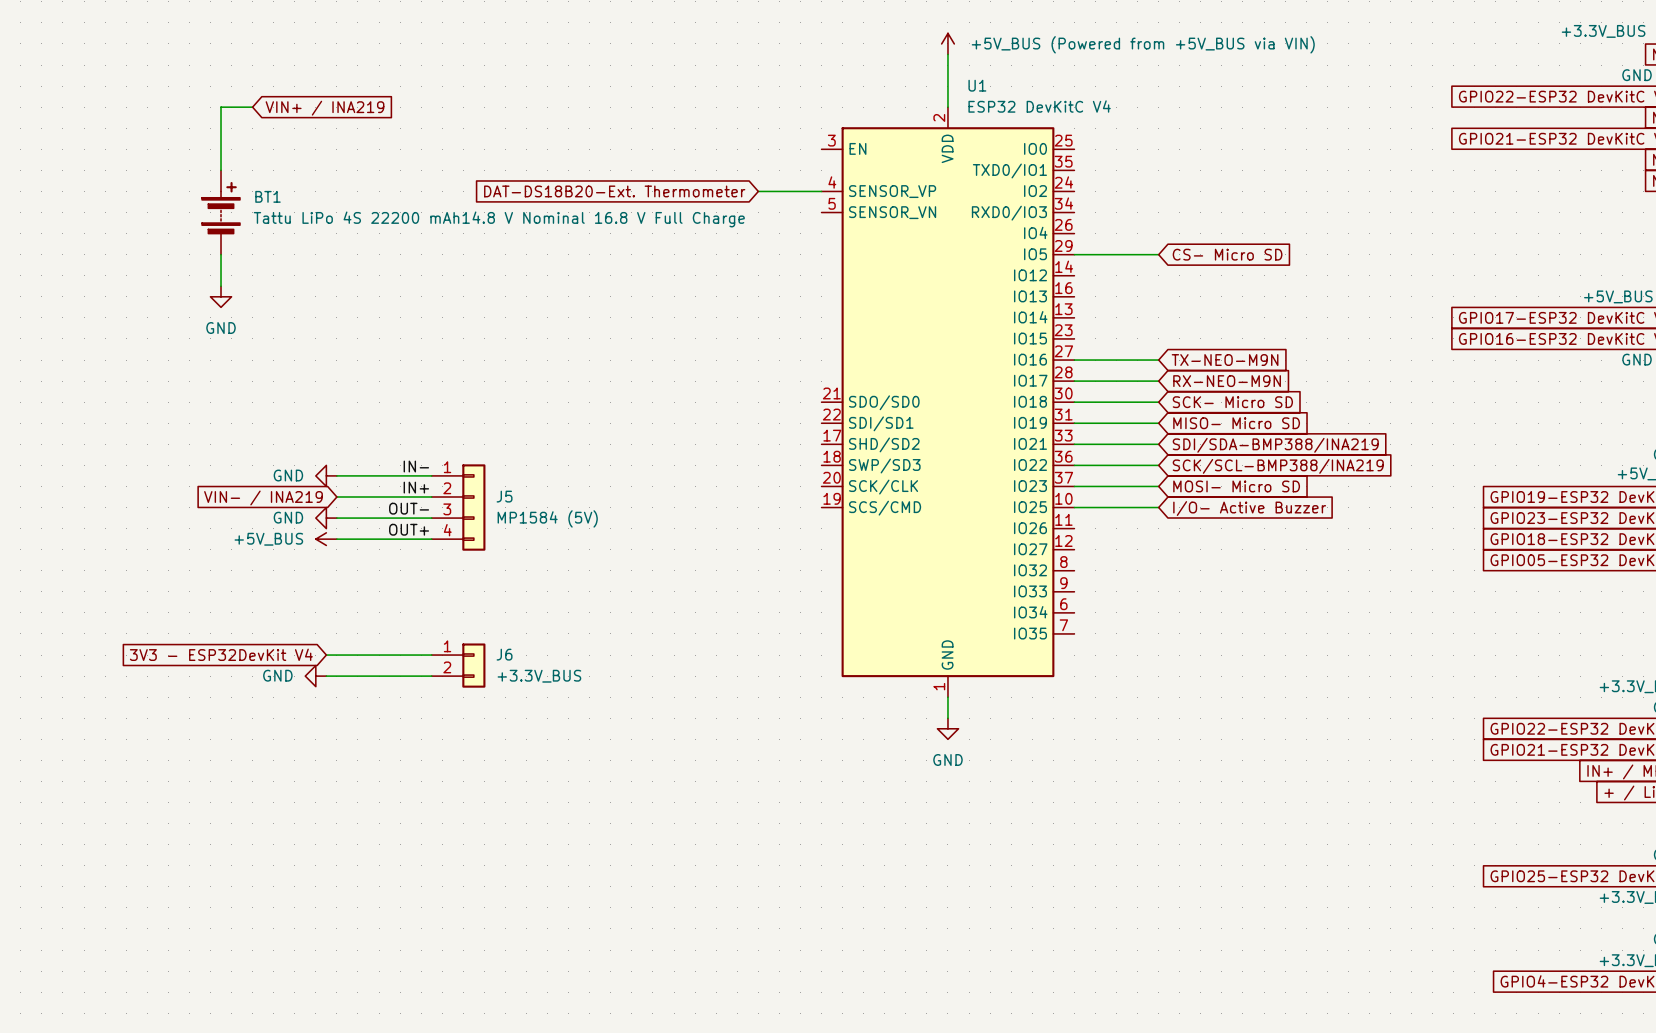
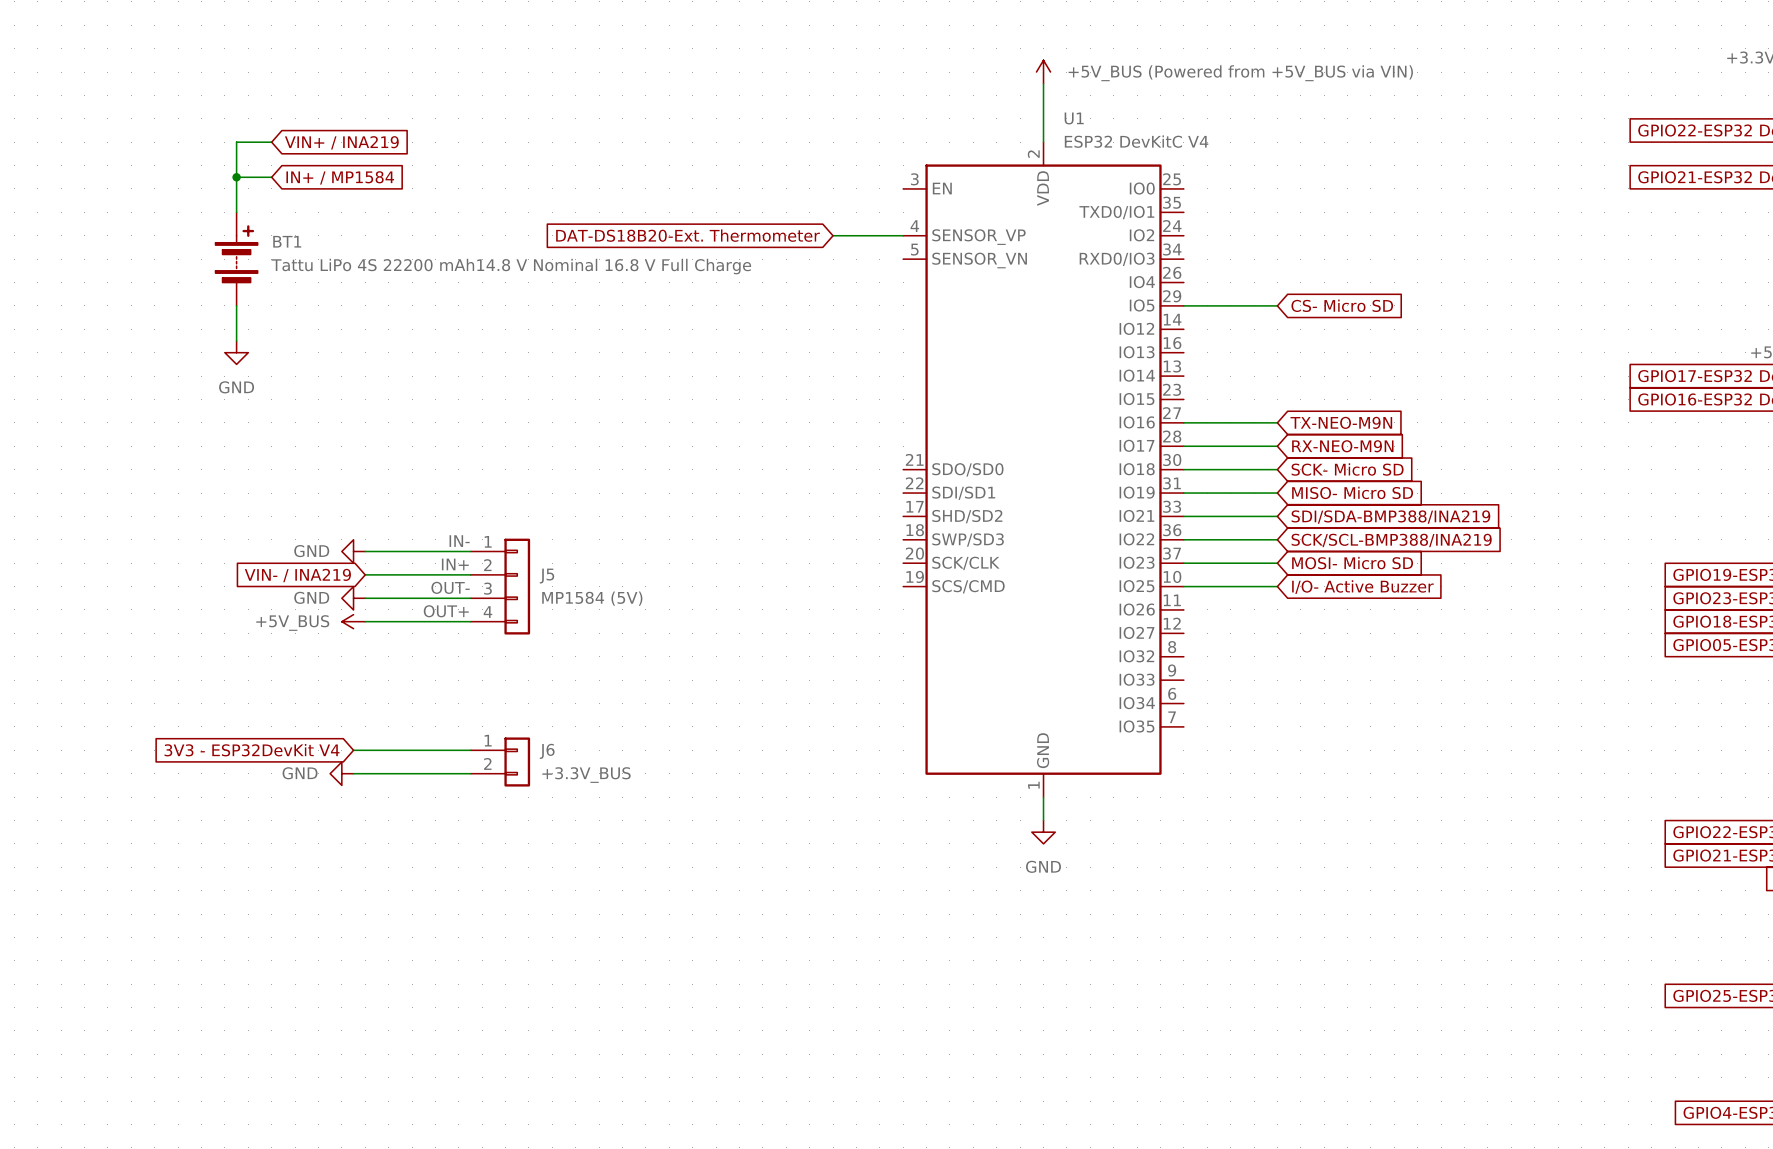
wire: none -> (236, 177) (271, 177)
junction: none -> (236, 177)
global label: none -> IN+ / MP1584 (340, 177)

